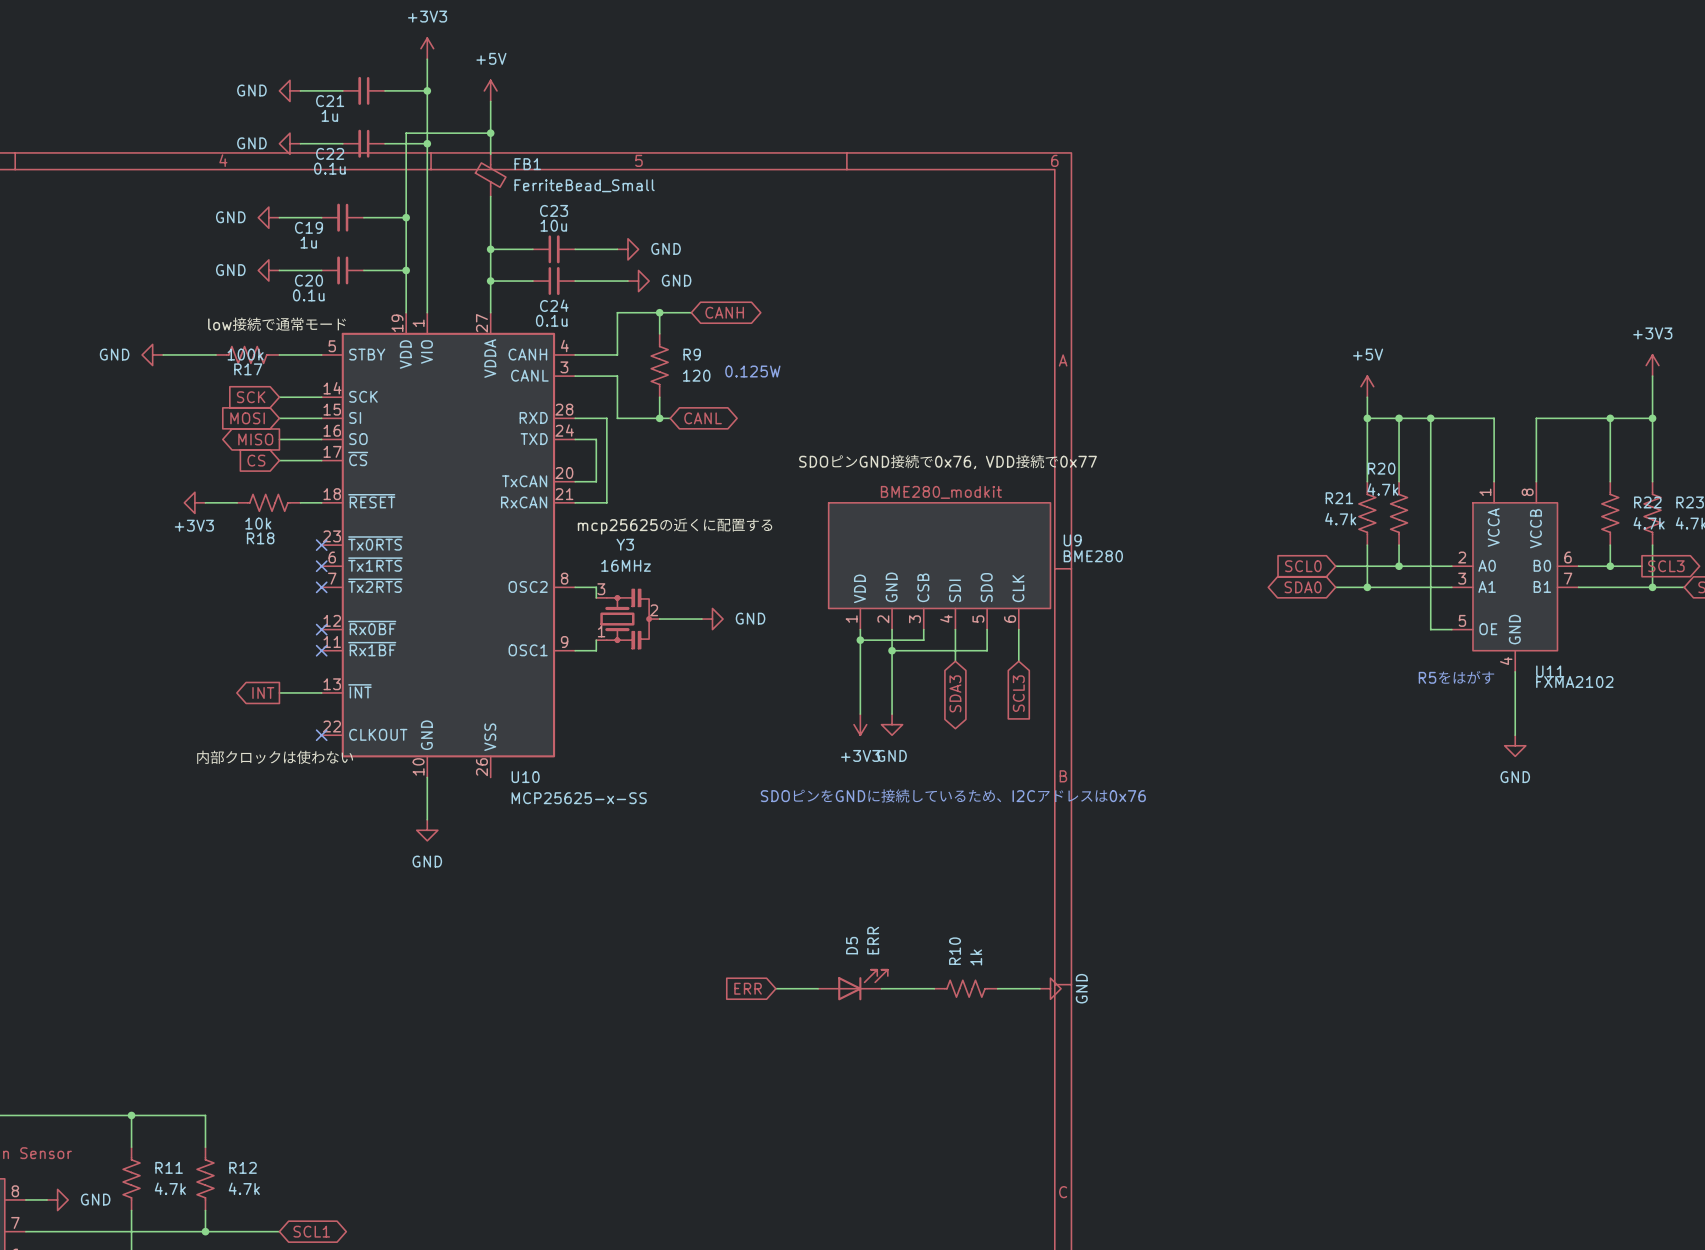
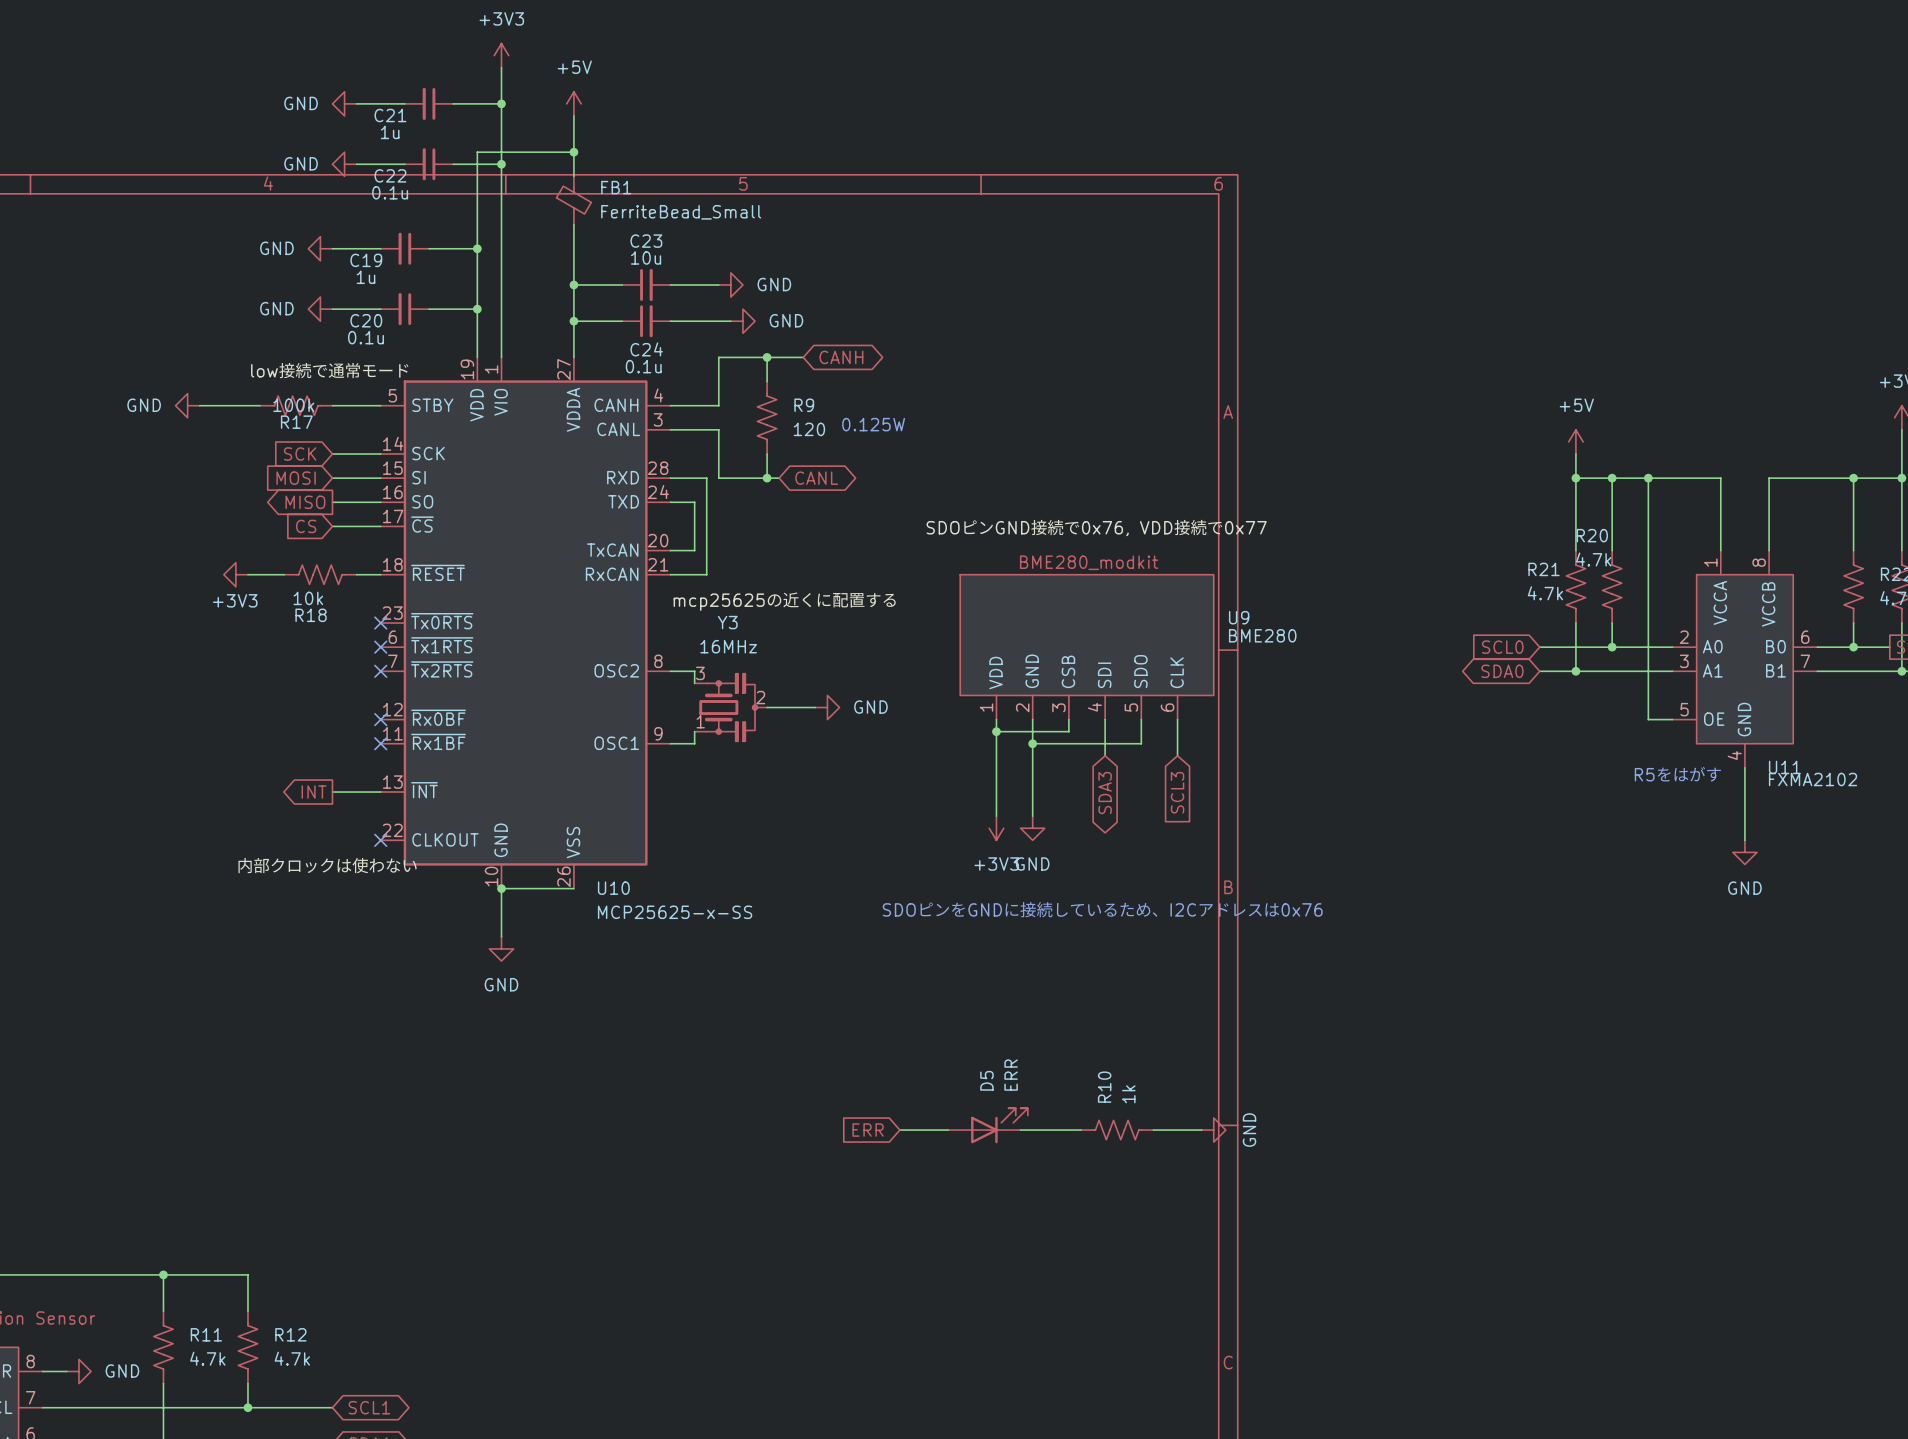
wire: none -> (501, 888) (573, 888)
junction: none -> (501, 888)

